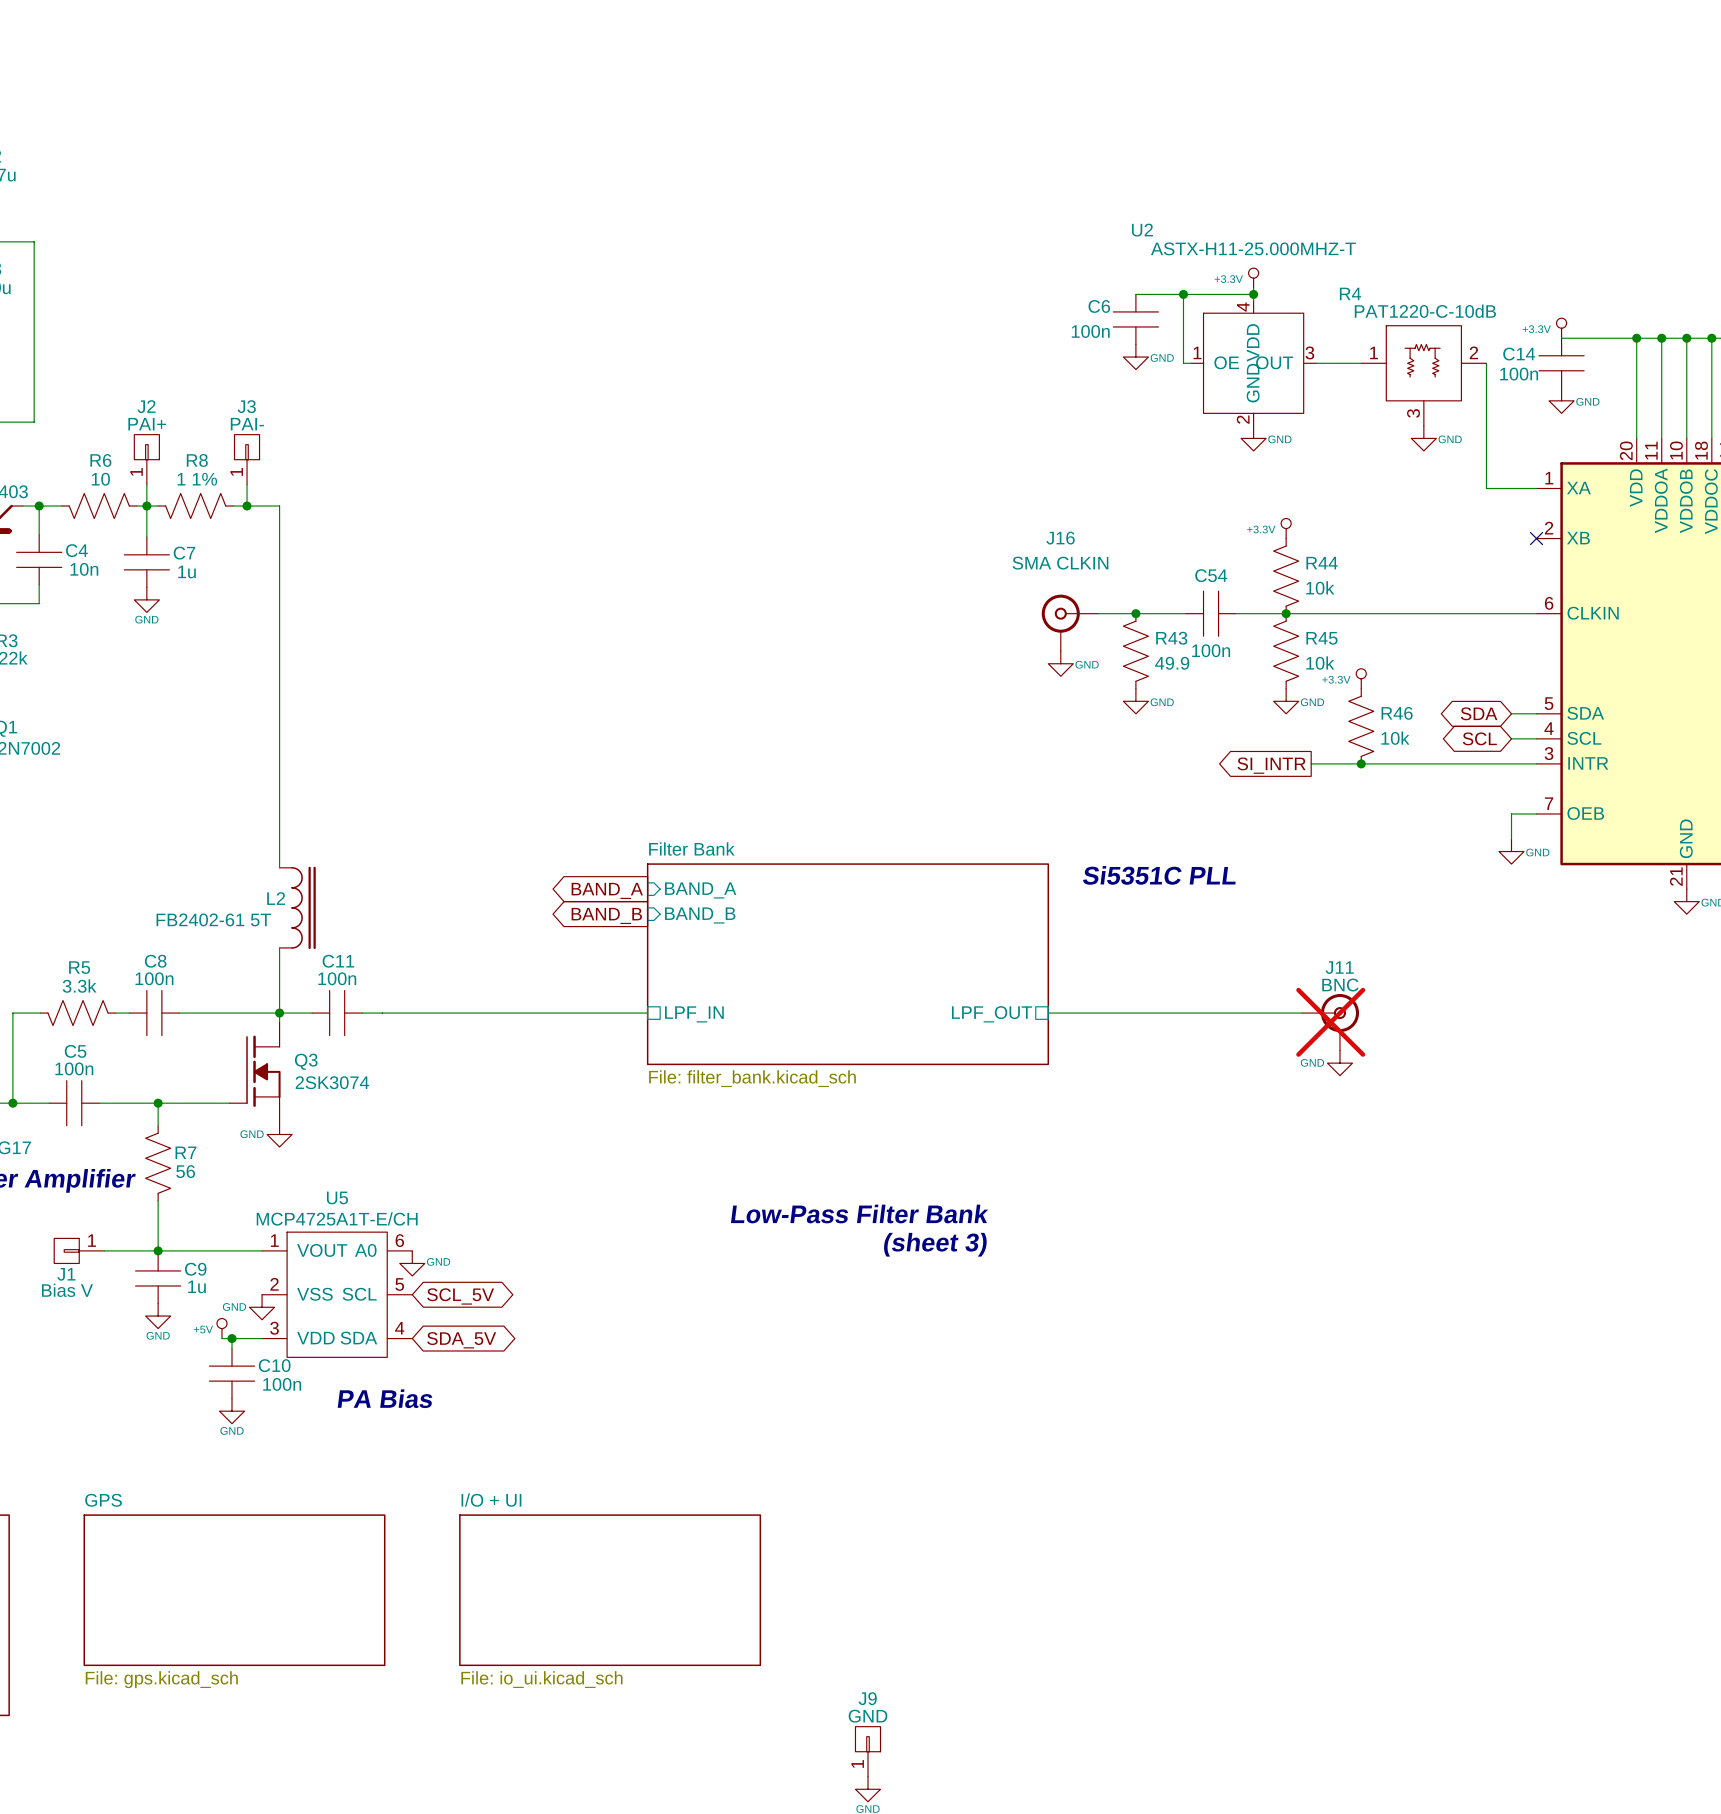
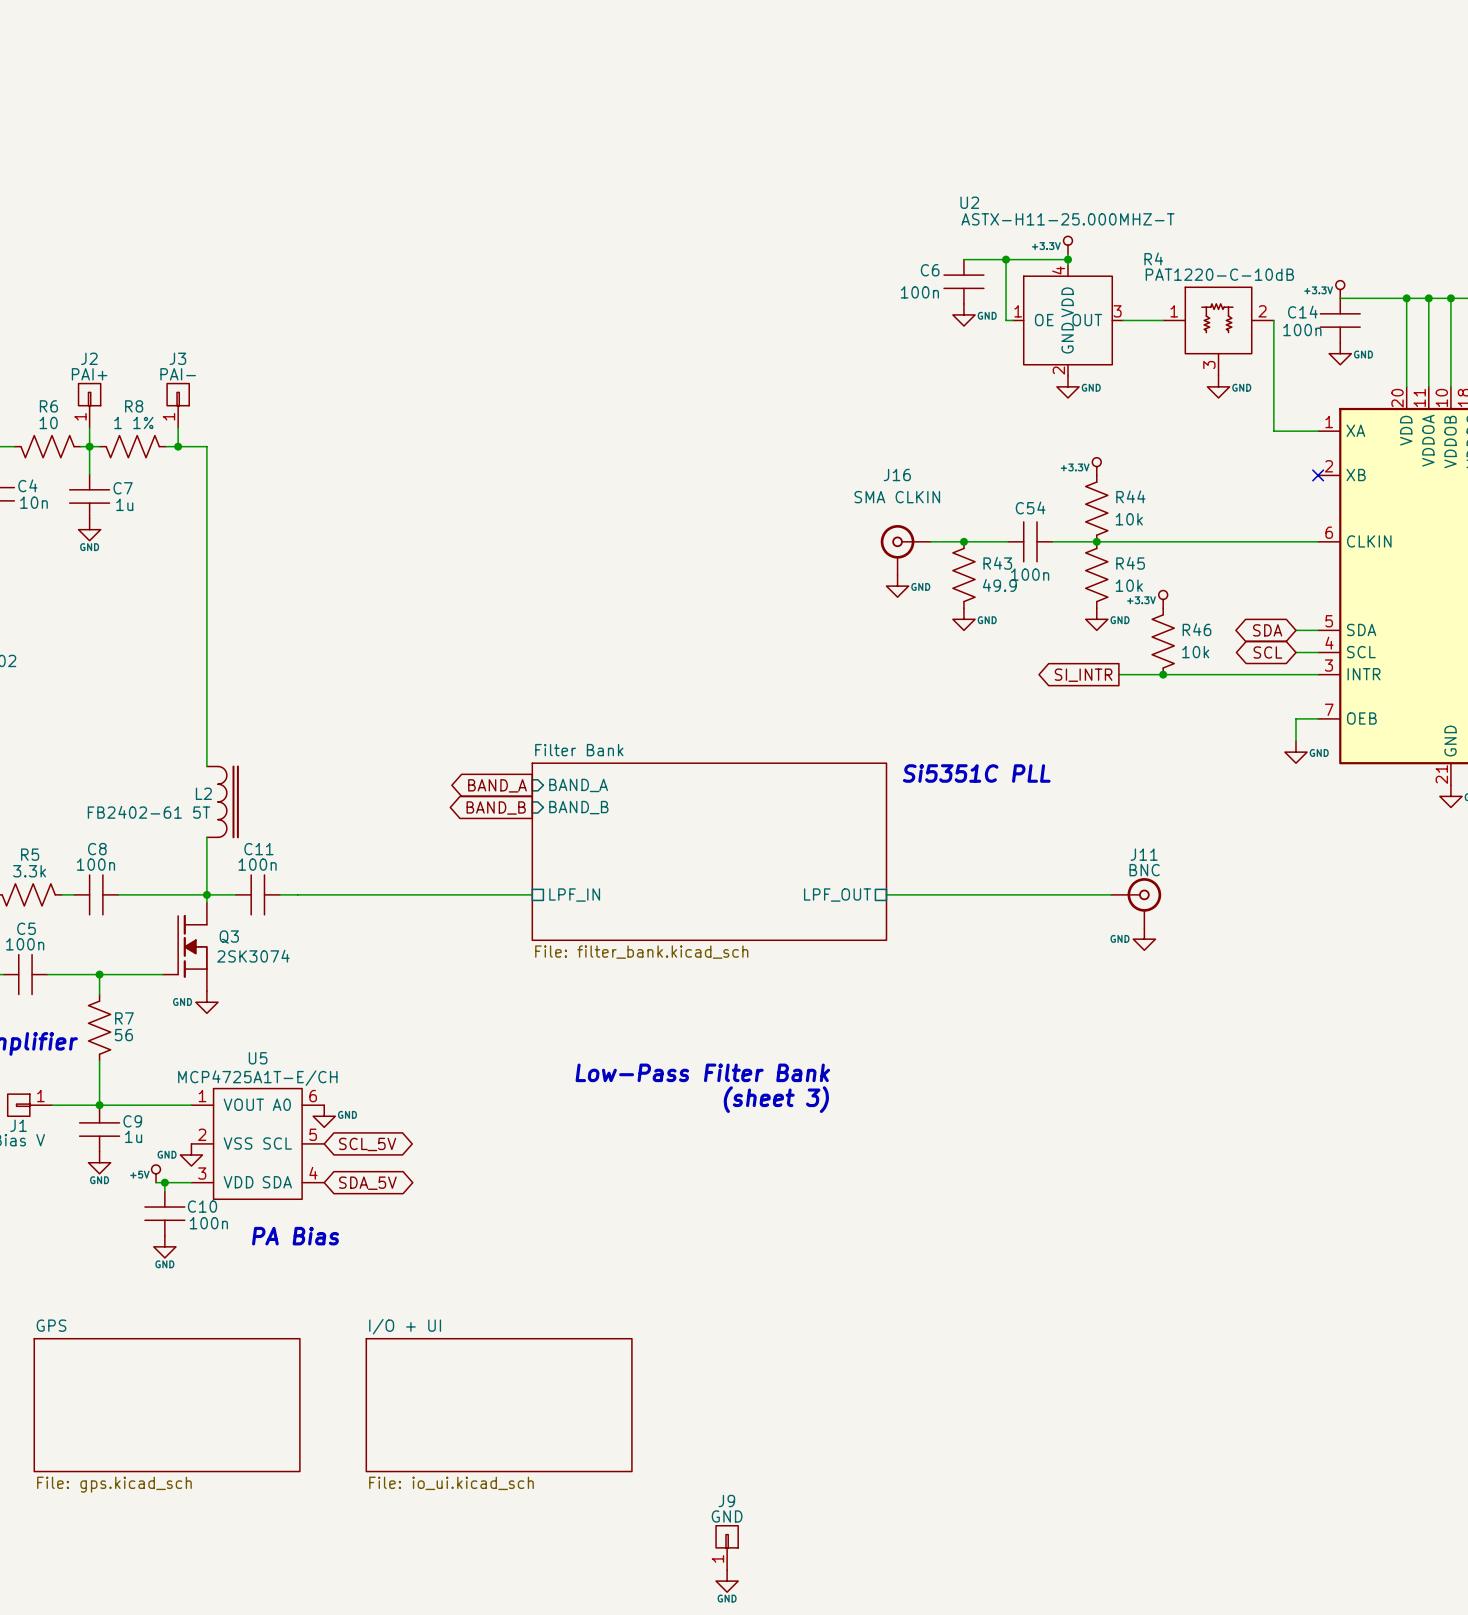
J11 do-not-place cross: (1330, 1022) -> none

